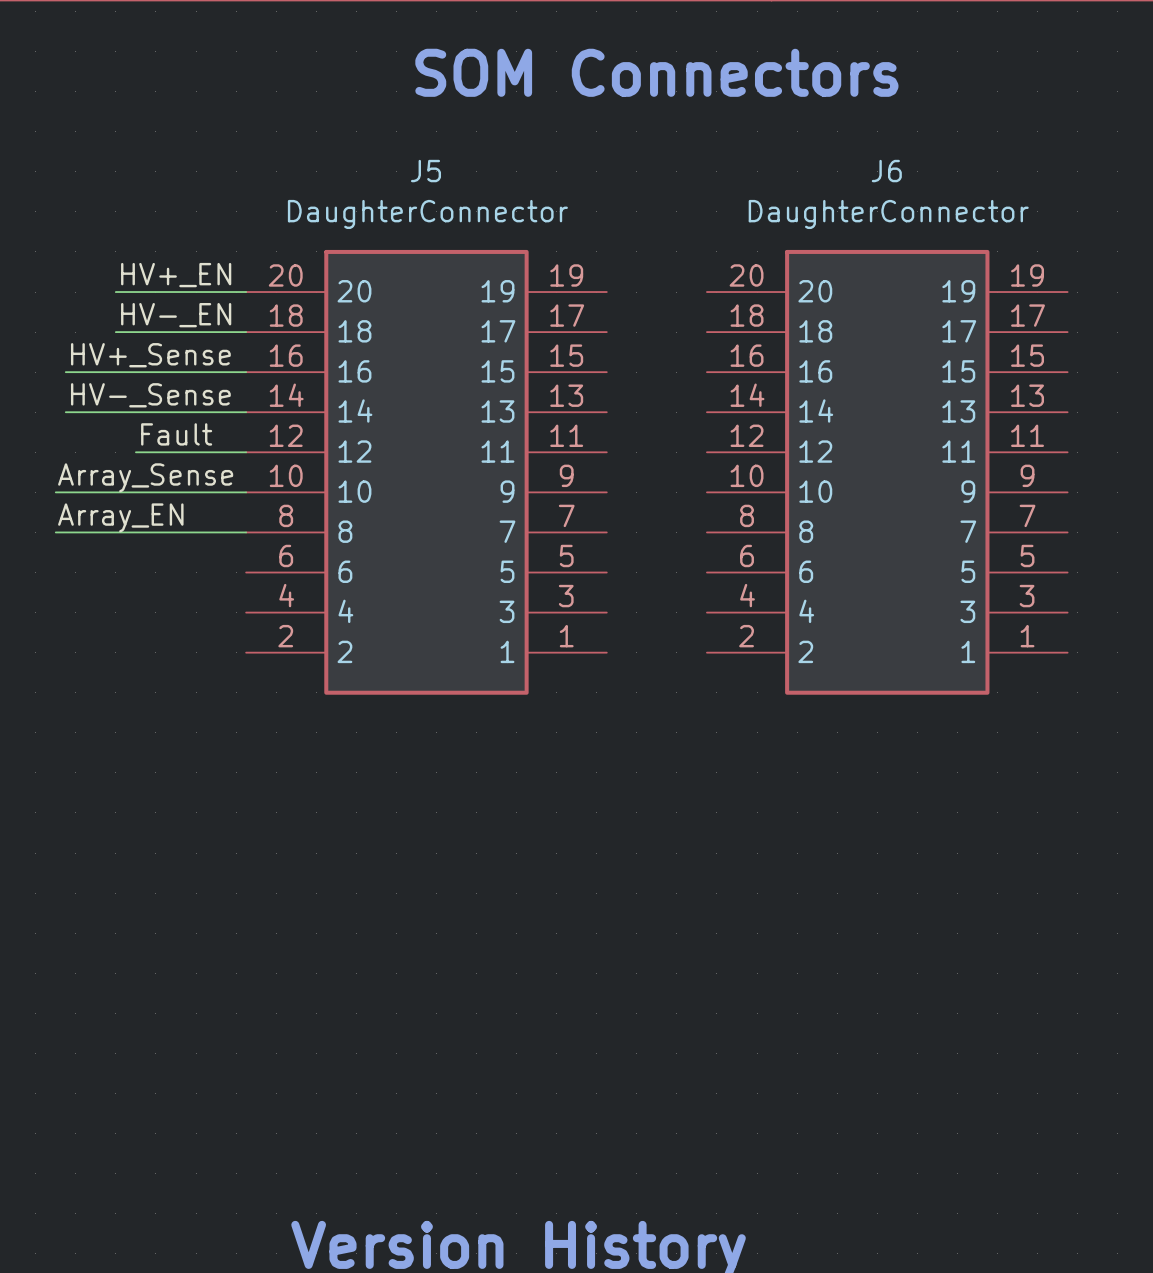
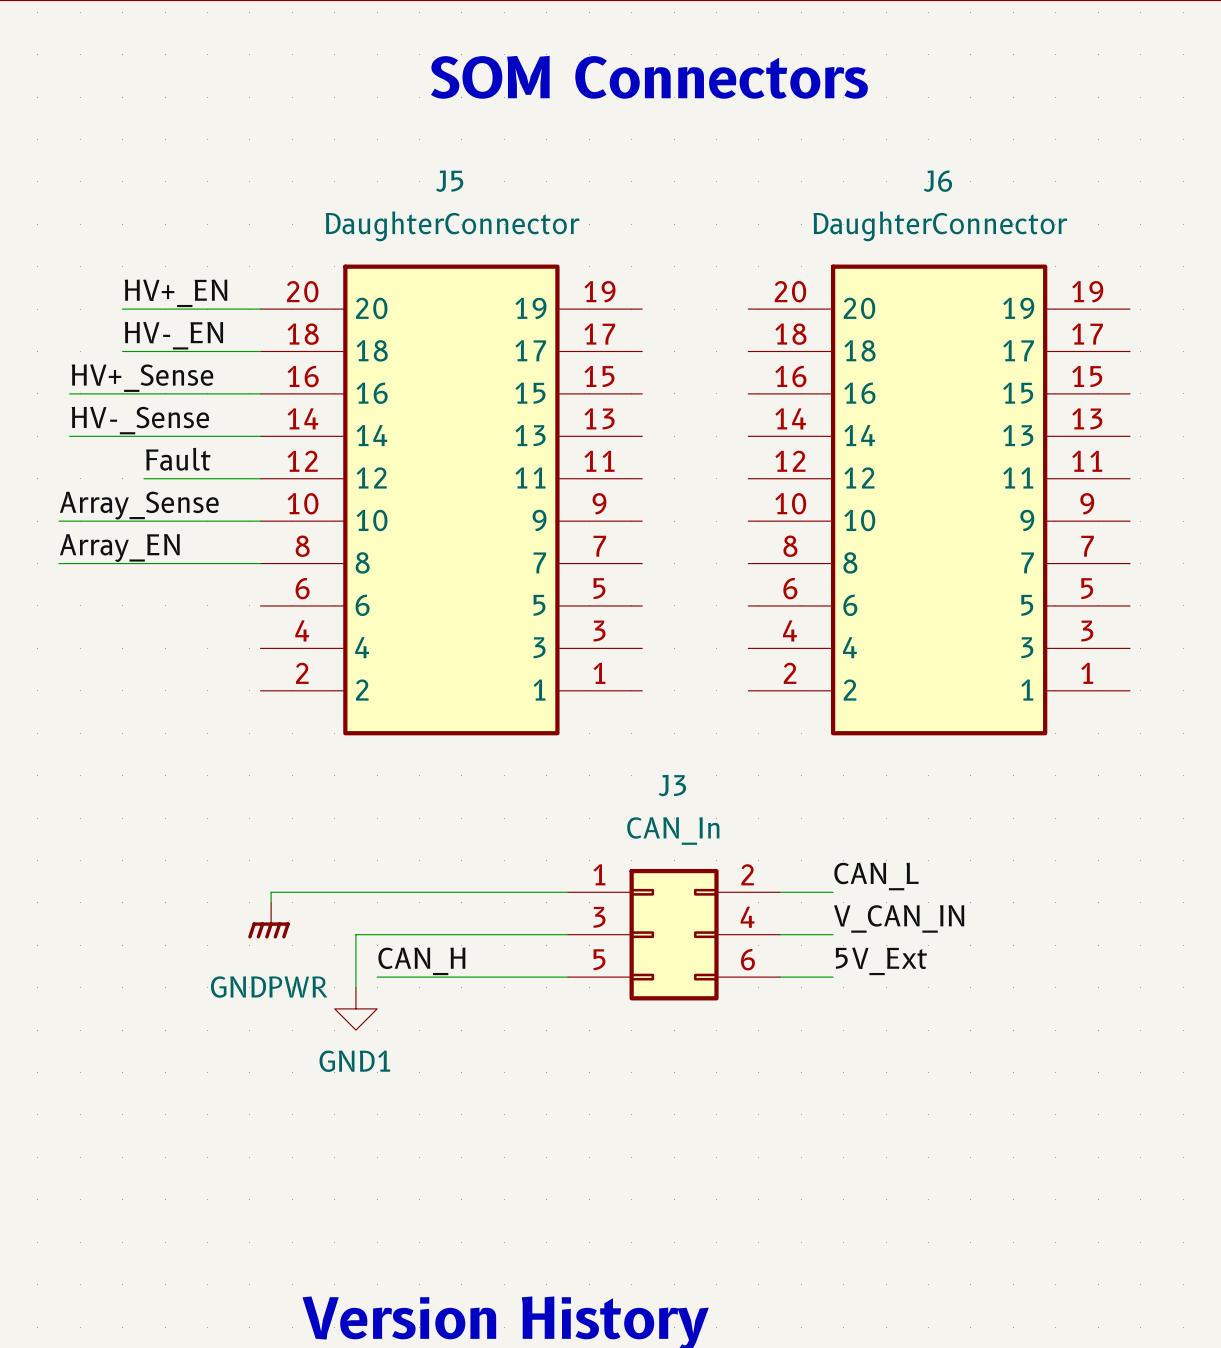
label: none -> CAN_L (876, 876)
wire: none -> (568, 892) (271, 892) (271, 902)
wire: none -> (780, 892) (833, 892)
label: none -> V_CAN_IN (899, 918)
power symbol: none -> GNDPWR (269, 920)
wire: none -> (568, 934) (355, 934) (355, 987)
J3: none -> CAN_In (674, 934)
wire: none -> (780, 934) (833, 934)
label: none -> CAN_H (421, 961)
label: none -> 5V_Ext (881, 961)
wire: none -> (377, 977) (568, 977)
wire: none -> (780, 977) (833, 977)
power symbol: none -> GND1 (355, 1008)

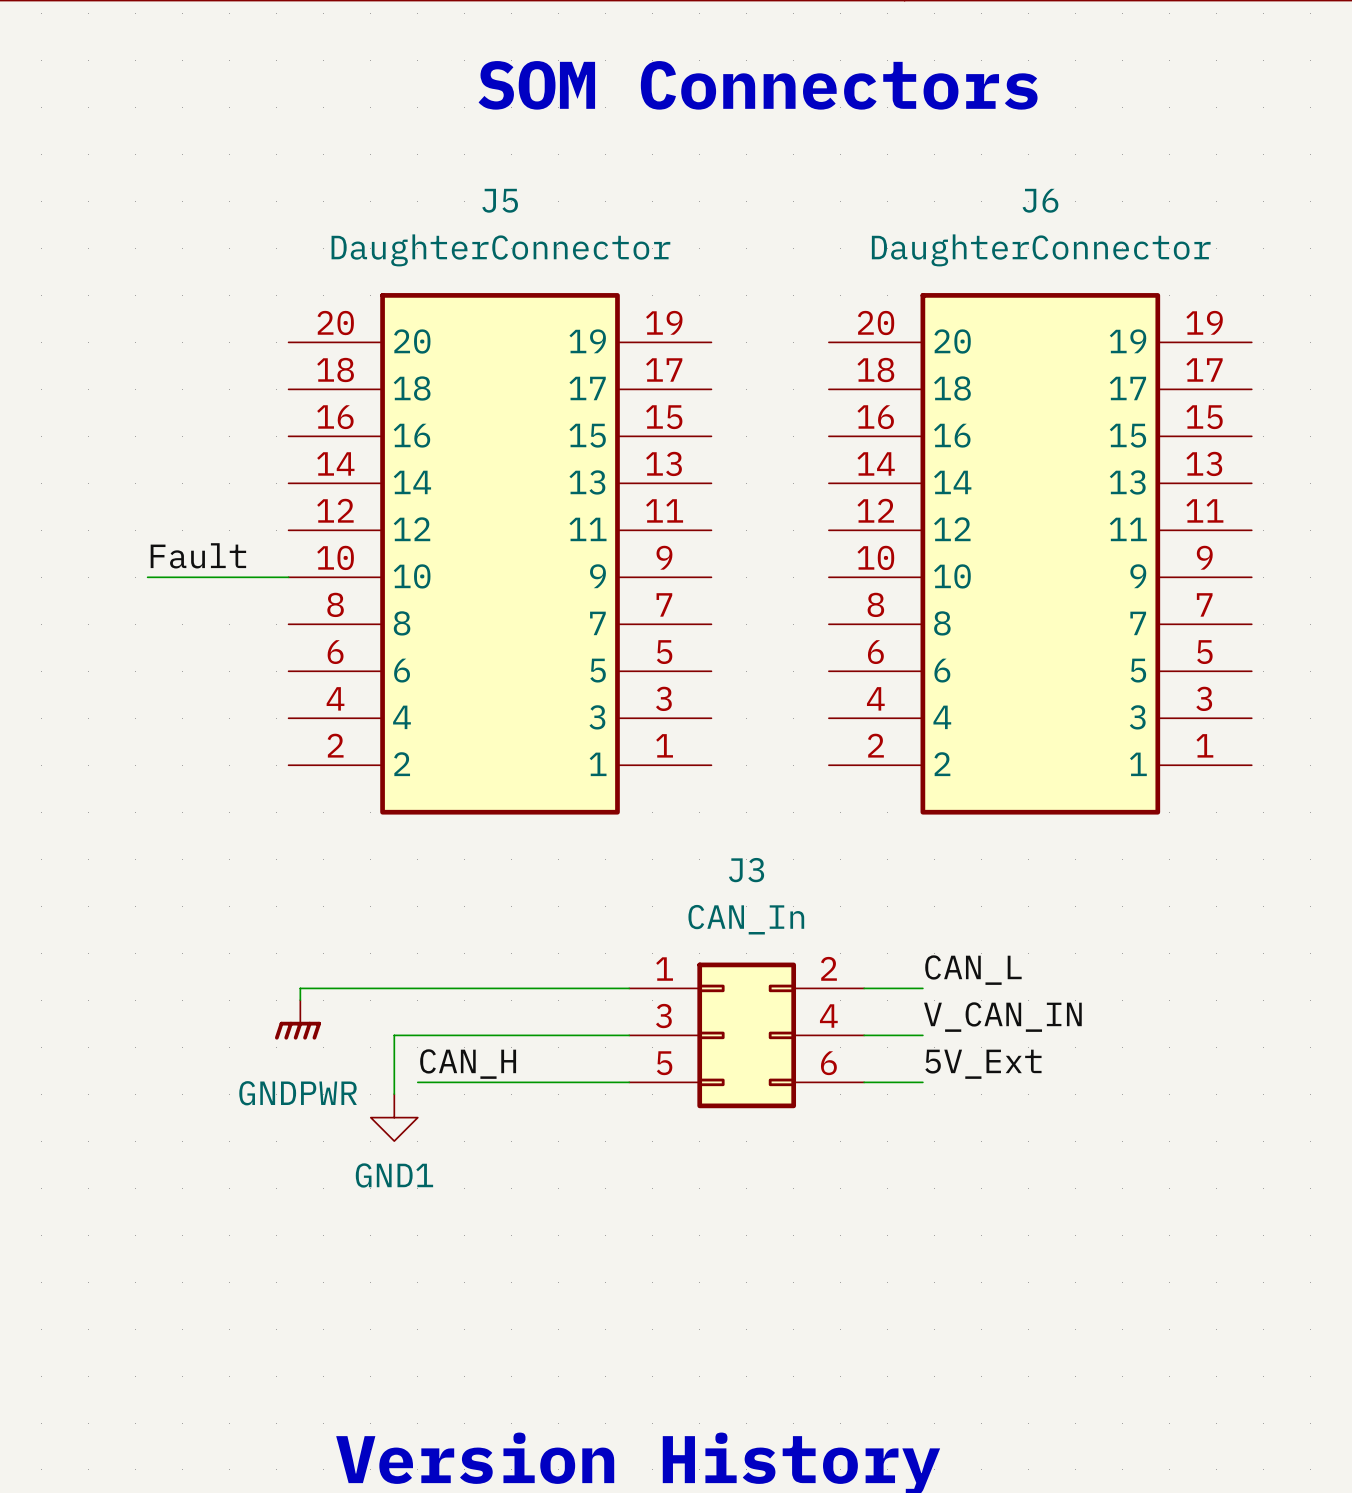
label: HV+_EN (176, 293) -> none
wire: (122, 309) (260, 309) -> none
label: HV-_EN (173, 335) -> none
wire: (122, 351) (260, 351) -> none
label: HV+_Sense (142, 378) -> none
wire: (69, 393) (260, 393) -> none
label: HV-_Sense (140, 420) -> none
wire: (69, 436) (260, 436) -> none
label position: Fault (178, 459) -> Fault (198, 555)
wire: (143, 478) (260, 478) -> none
label: Array_Sense (139, 505) -> none
wire: (59, 521) (133, 521) -> none
label: Array_EN (119, 547) -> none
wire: (59, 563) (260, 563) -> none

